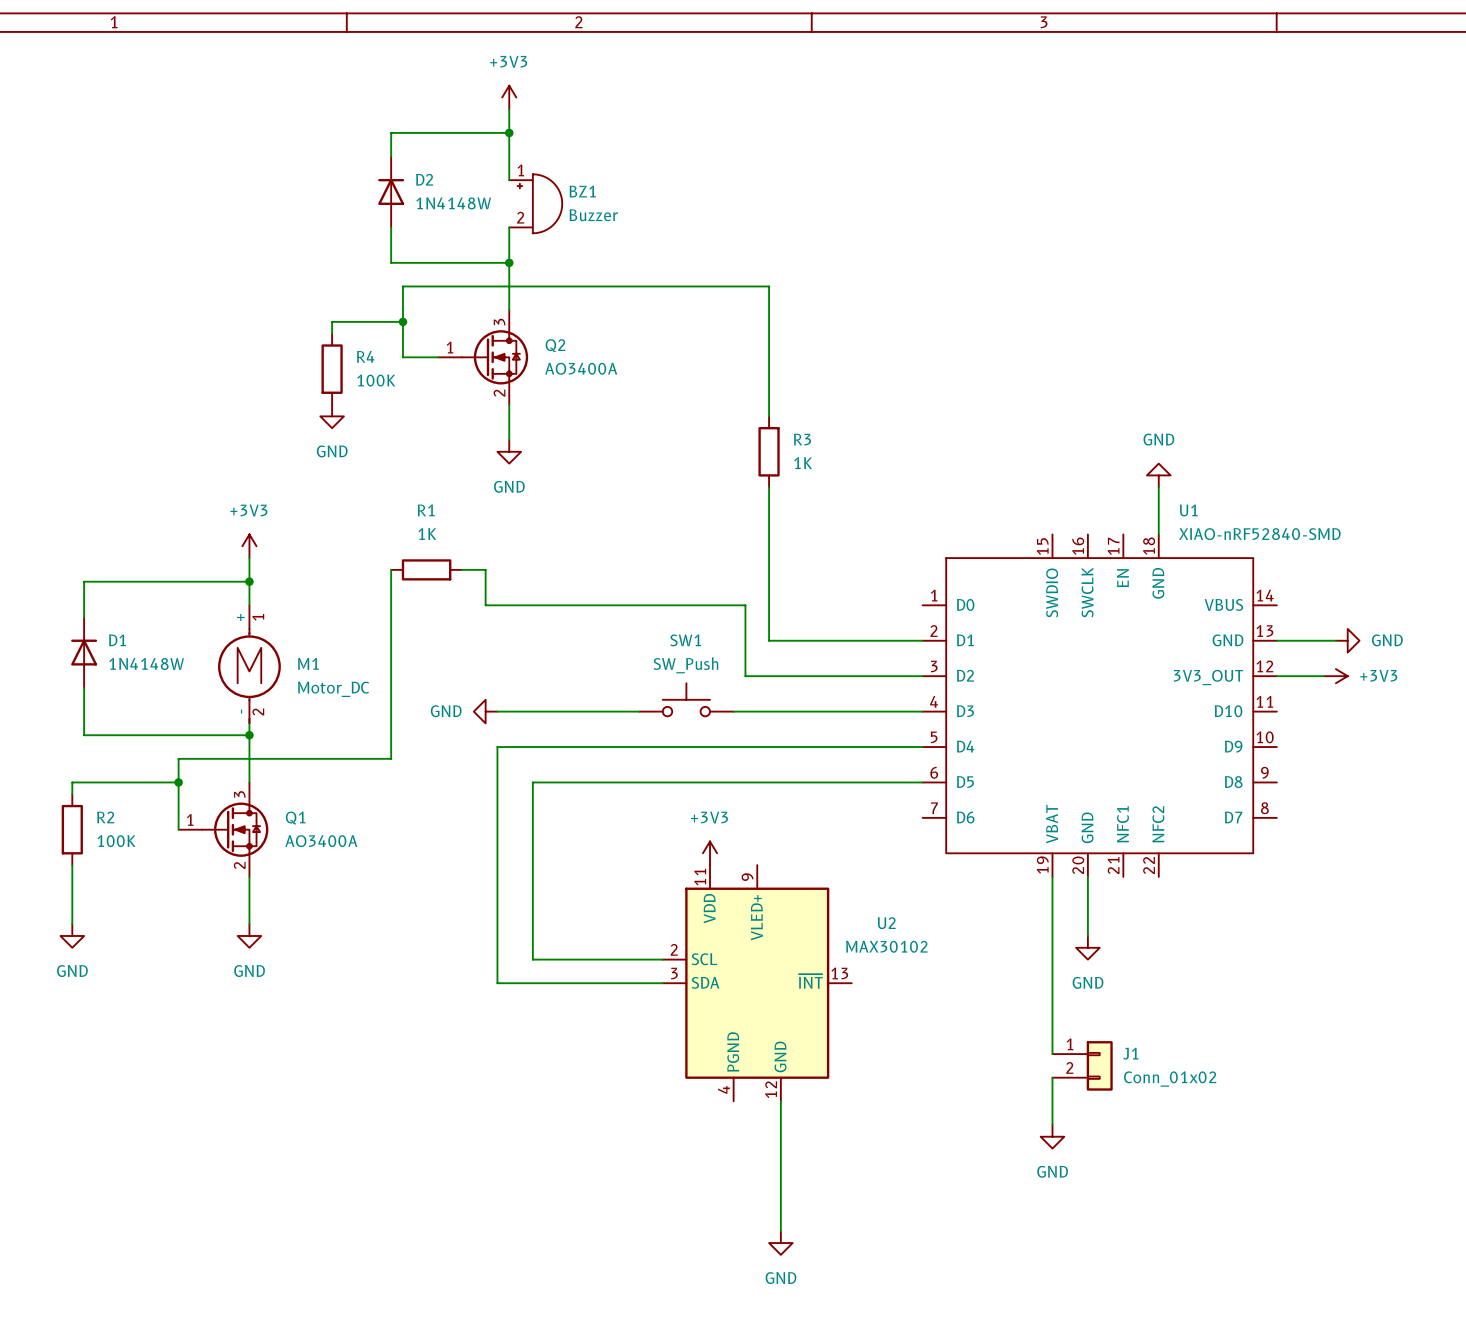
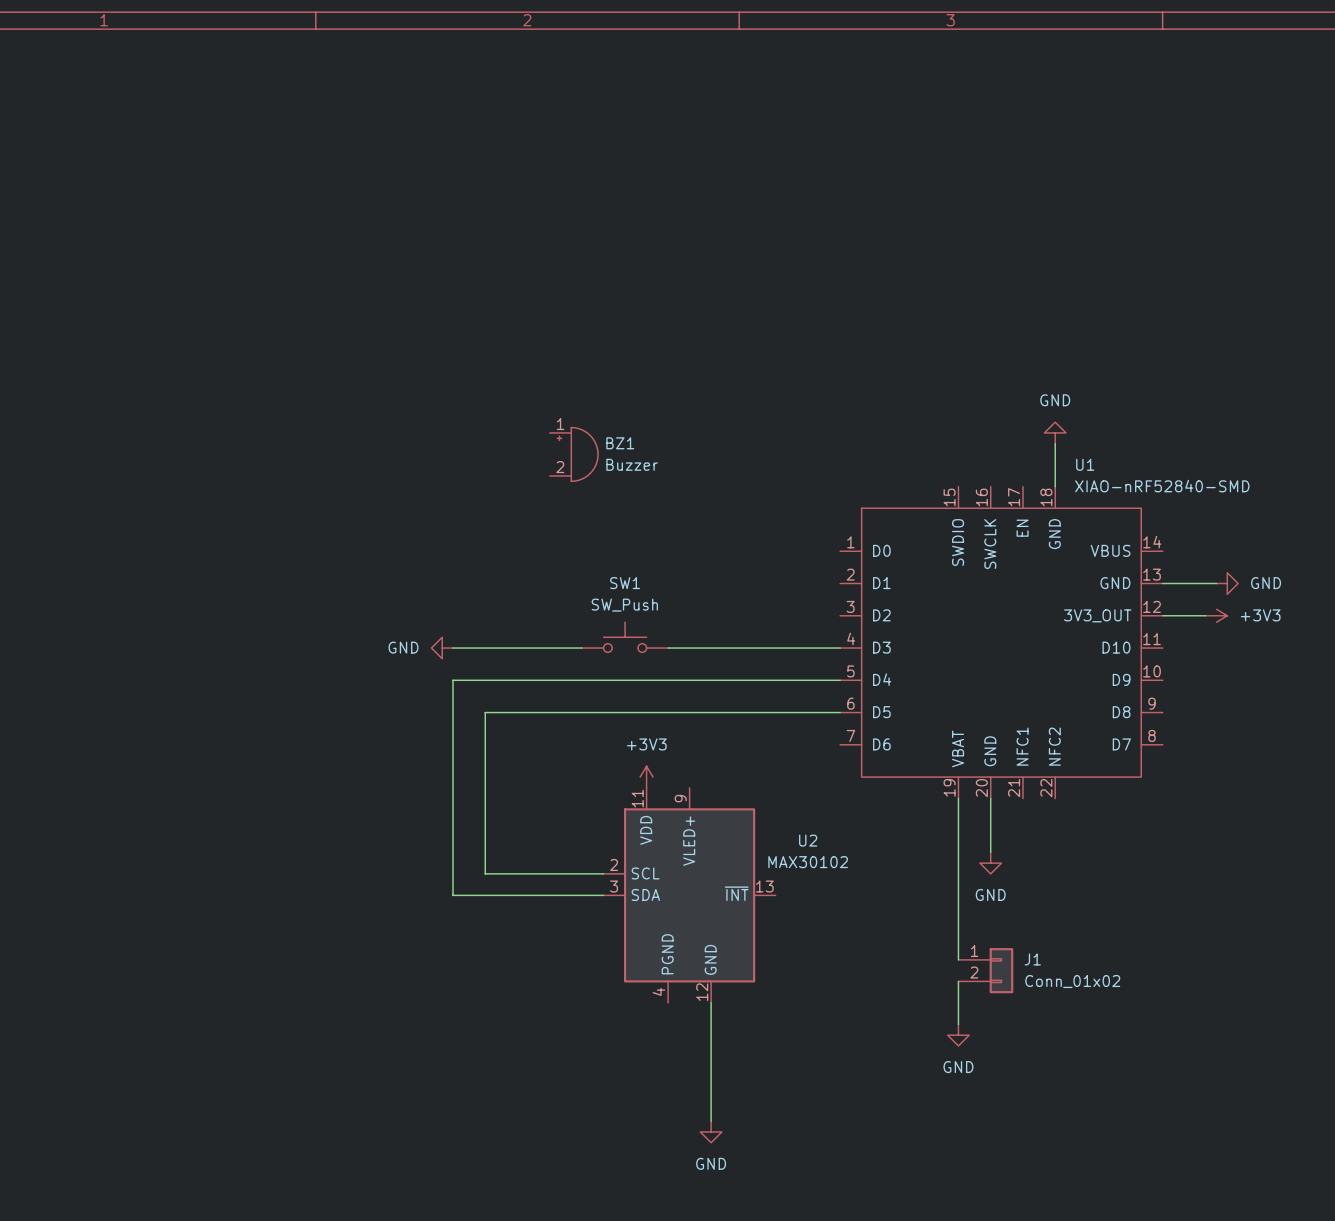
power symbol: +3V3 (509, 97) -> none
wire: (509, 109) (509, 180) -> none
wire: (509, 132) (391, 132) (391, 156) -> none
junction: (509, 132) -> none
D2: 1N4148W (391, 191) -> none
BZ1 position: (535, 203) -> (573, 454)
wire: (391, 227) (391, 262) (509, 262) -> none
wire: (509, 227) (509, 310) -> none
junction: (509, 262) -> none
wire: (402, 321) (332, 321) (332, 333) -> none
junction: (402, 321) -> none
wire: (438, 357) (402, 357) (402, 286) (769, 286) (769, 416) -> none
Q2: AO3400A (483, 357) -> none
R4: 100K (332, 369) -> none
wire: (509, 404) (509, 439) -> none
power symbol: GND (332, 416) -> none
power symbol: GND (509, 451) -> none
R3: 1K (769, 451) -> none
wire: (769, 487) (769, 640) (922, 640) -> none
power symbol: +3V3 (249, 546) -> none
wire: (249, 558) (249, 605) -> none
wire: (391, 569) (391, 758) (178, 758) (178, 829) -> none
R1: 1K (426, 569) -> none
wire: (462, 569) (485, 569) (485, 605) (745, 605) (745, 676) (922, 676) -> none
wire: (249, 581) (84, 581) (84, 617) -> none
junction: (249, 581) -> none
D1: 1N4148W (84, 652) -> none
M1: Motor_DC (249, 664) -> none
wire: (84, 687) (84, 735) (249, 735) -> none
wire: (249, 723) (249, 782) -> none
junction: (249, 735) -> none
wire: (178, 782) (72, 782) (72, 794) -> none
junction: (178, 782) -> none
R2: 100K (72, 829) -> none
Q1: AO3400A (223, 829) -> none
wire: (72, 865) (72, 924) -> none
wire: (249, 876) (249, 924) -> none
power symbol: GND (72, 935) -> none
power symbol: GND (249, 935) -> none

